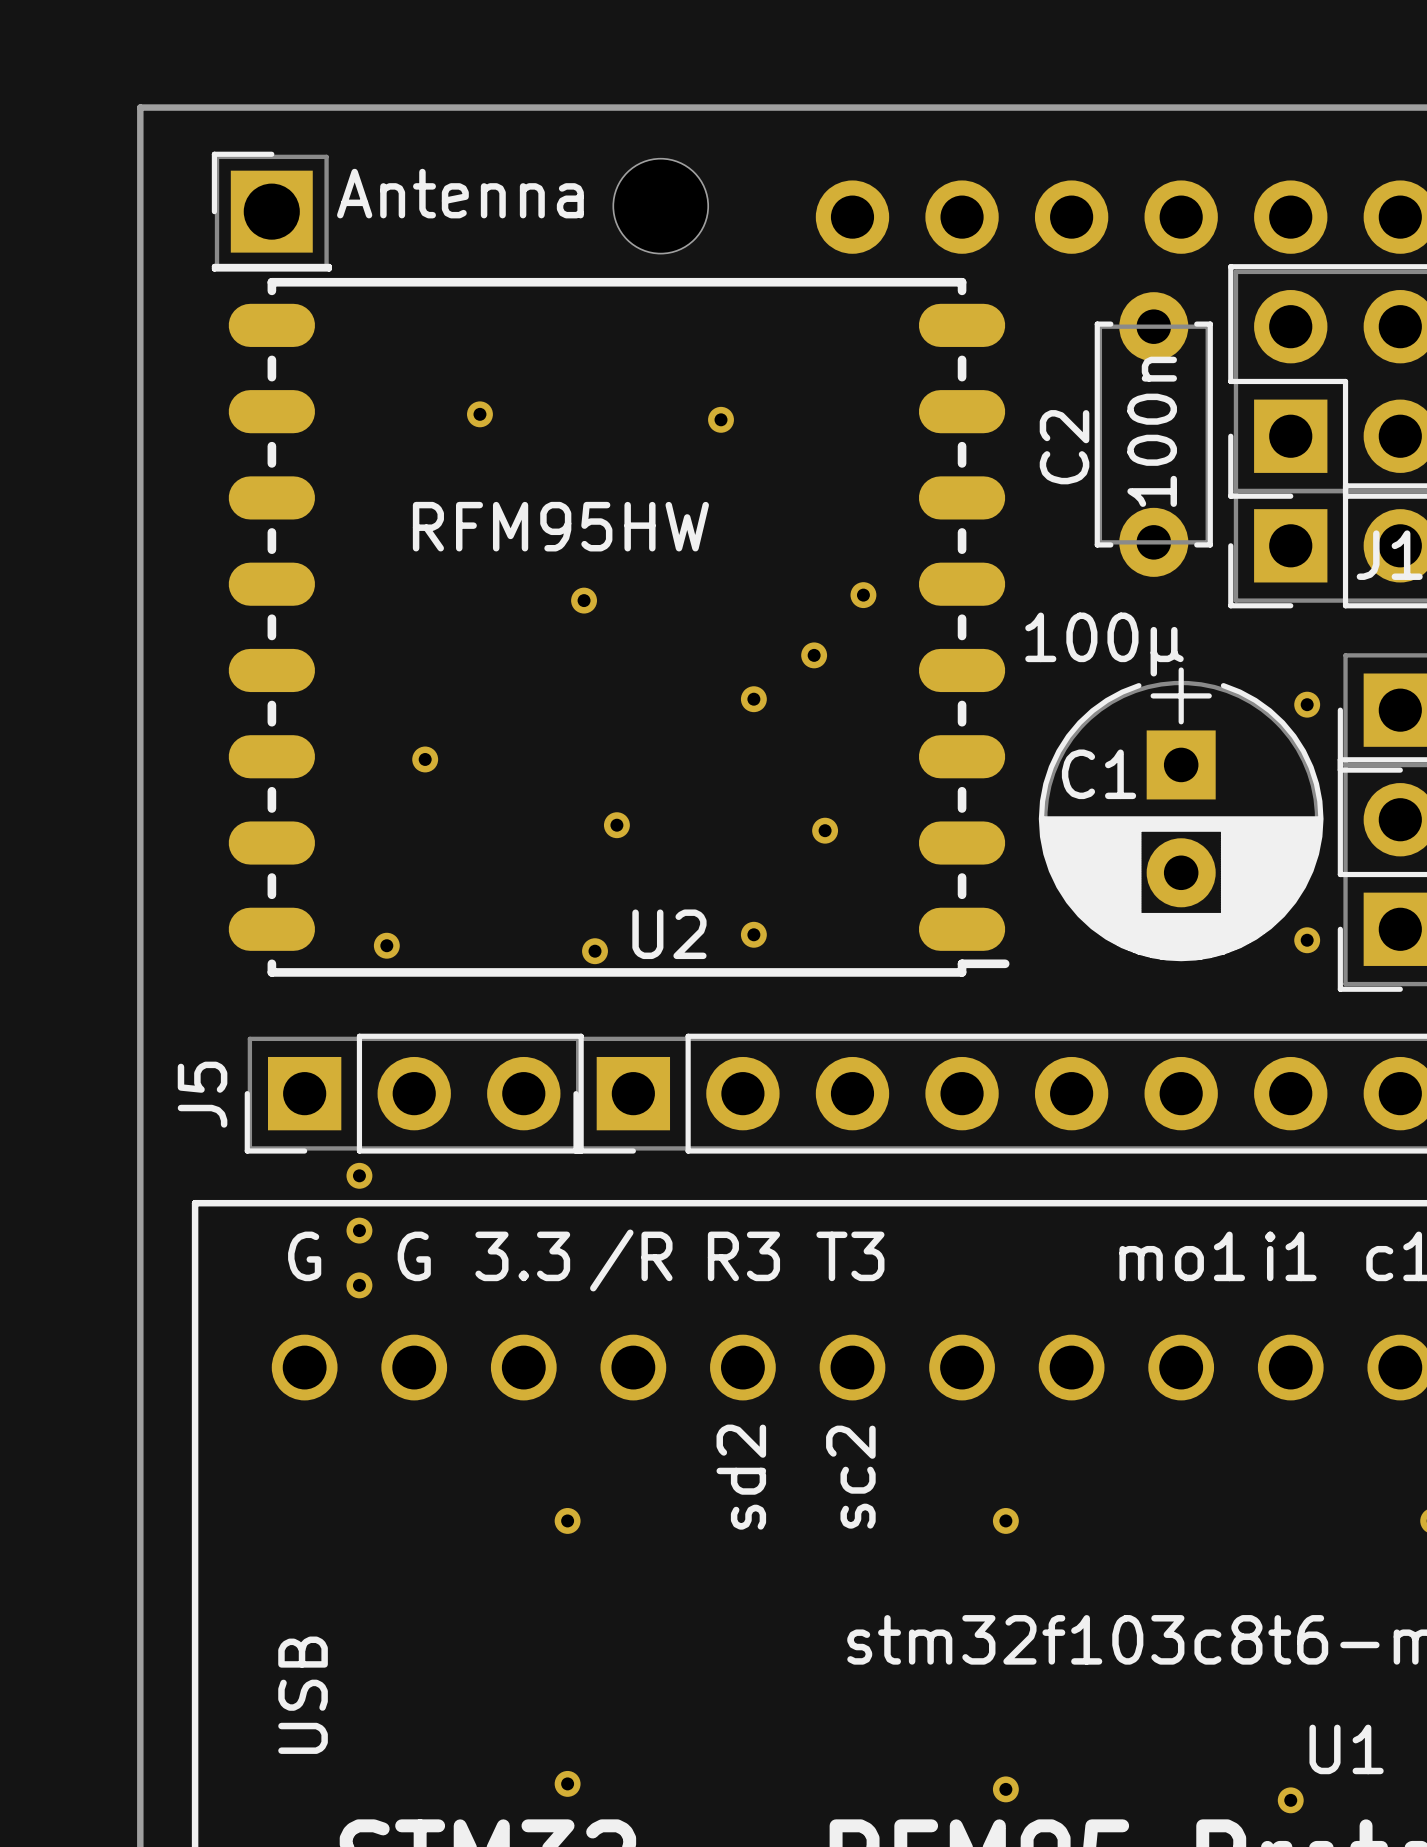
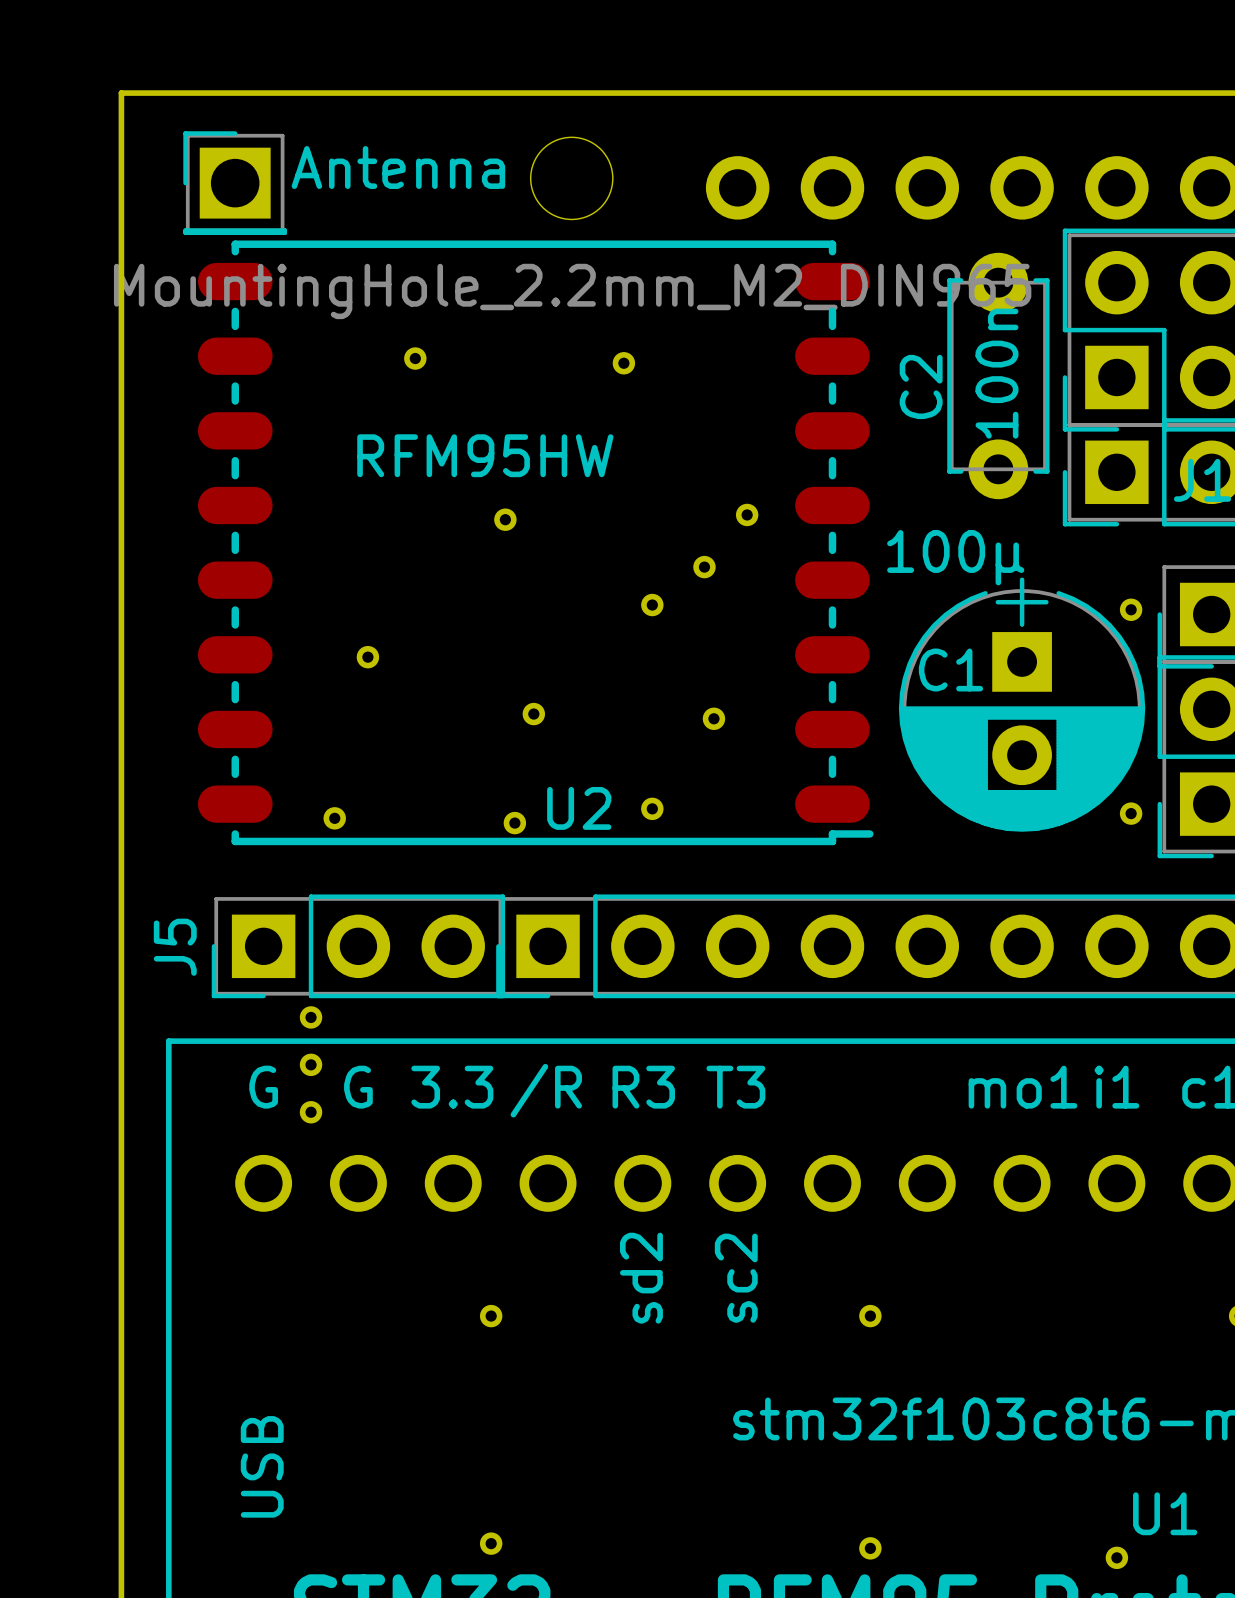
part value: none -> MountingHole_2.2mm_M2_DIN965 (572, 291)

